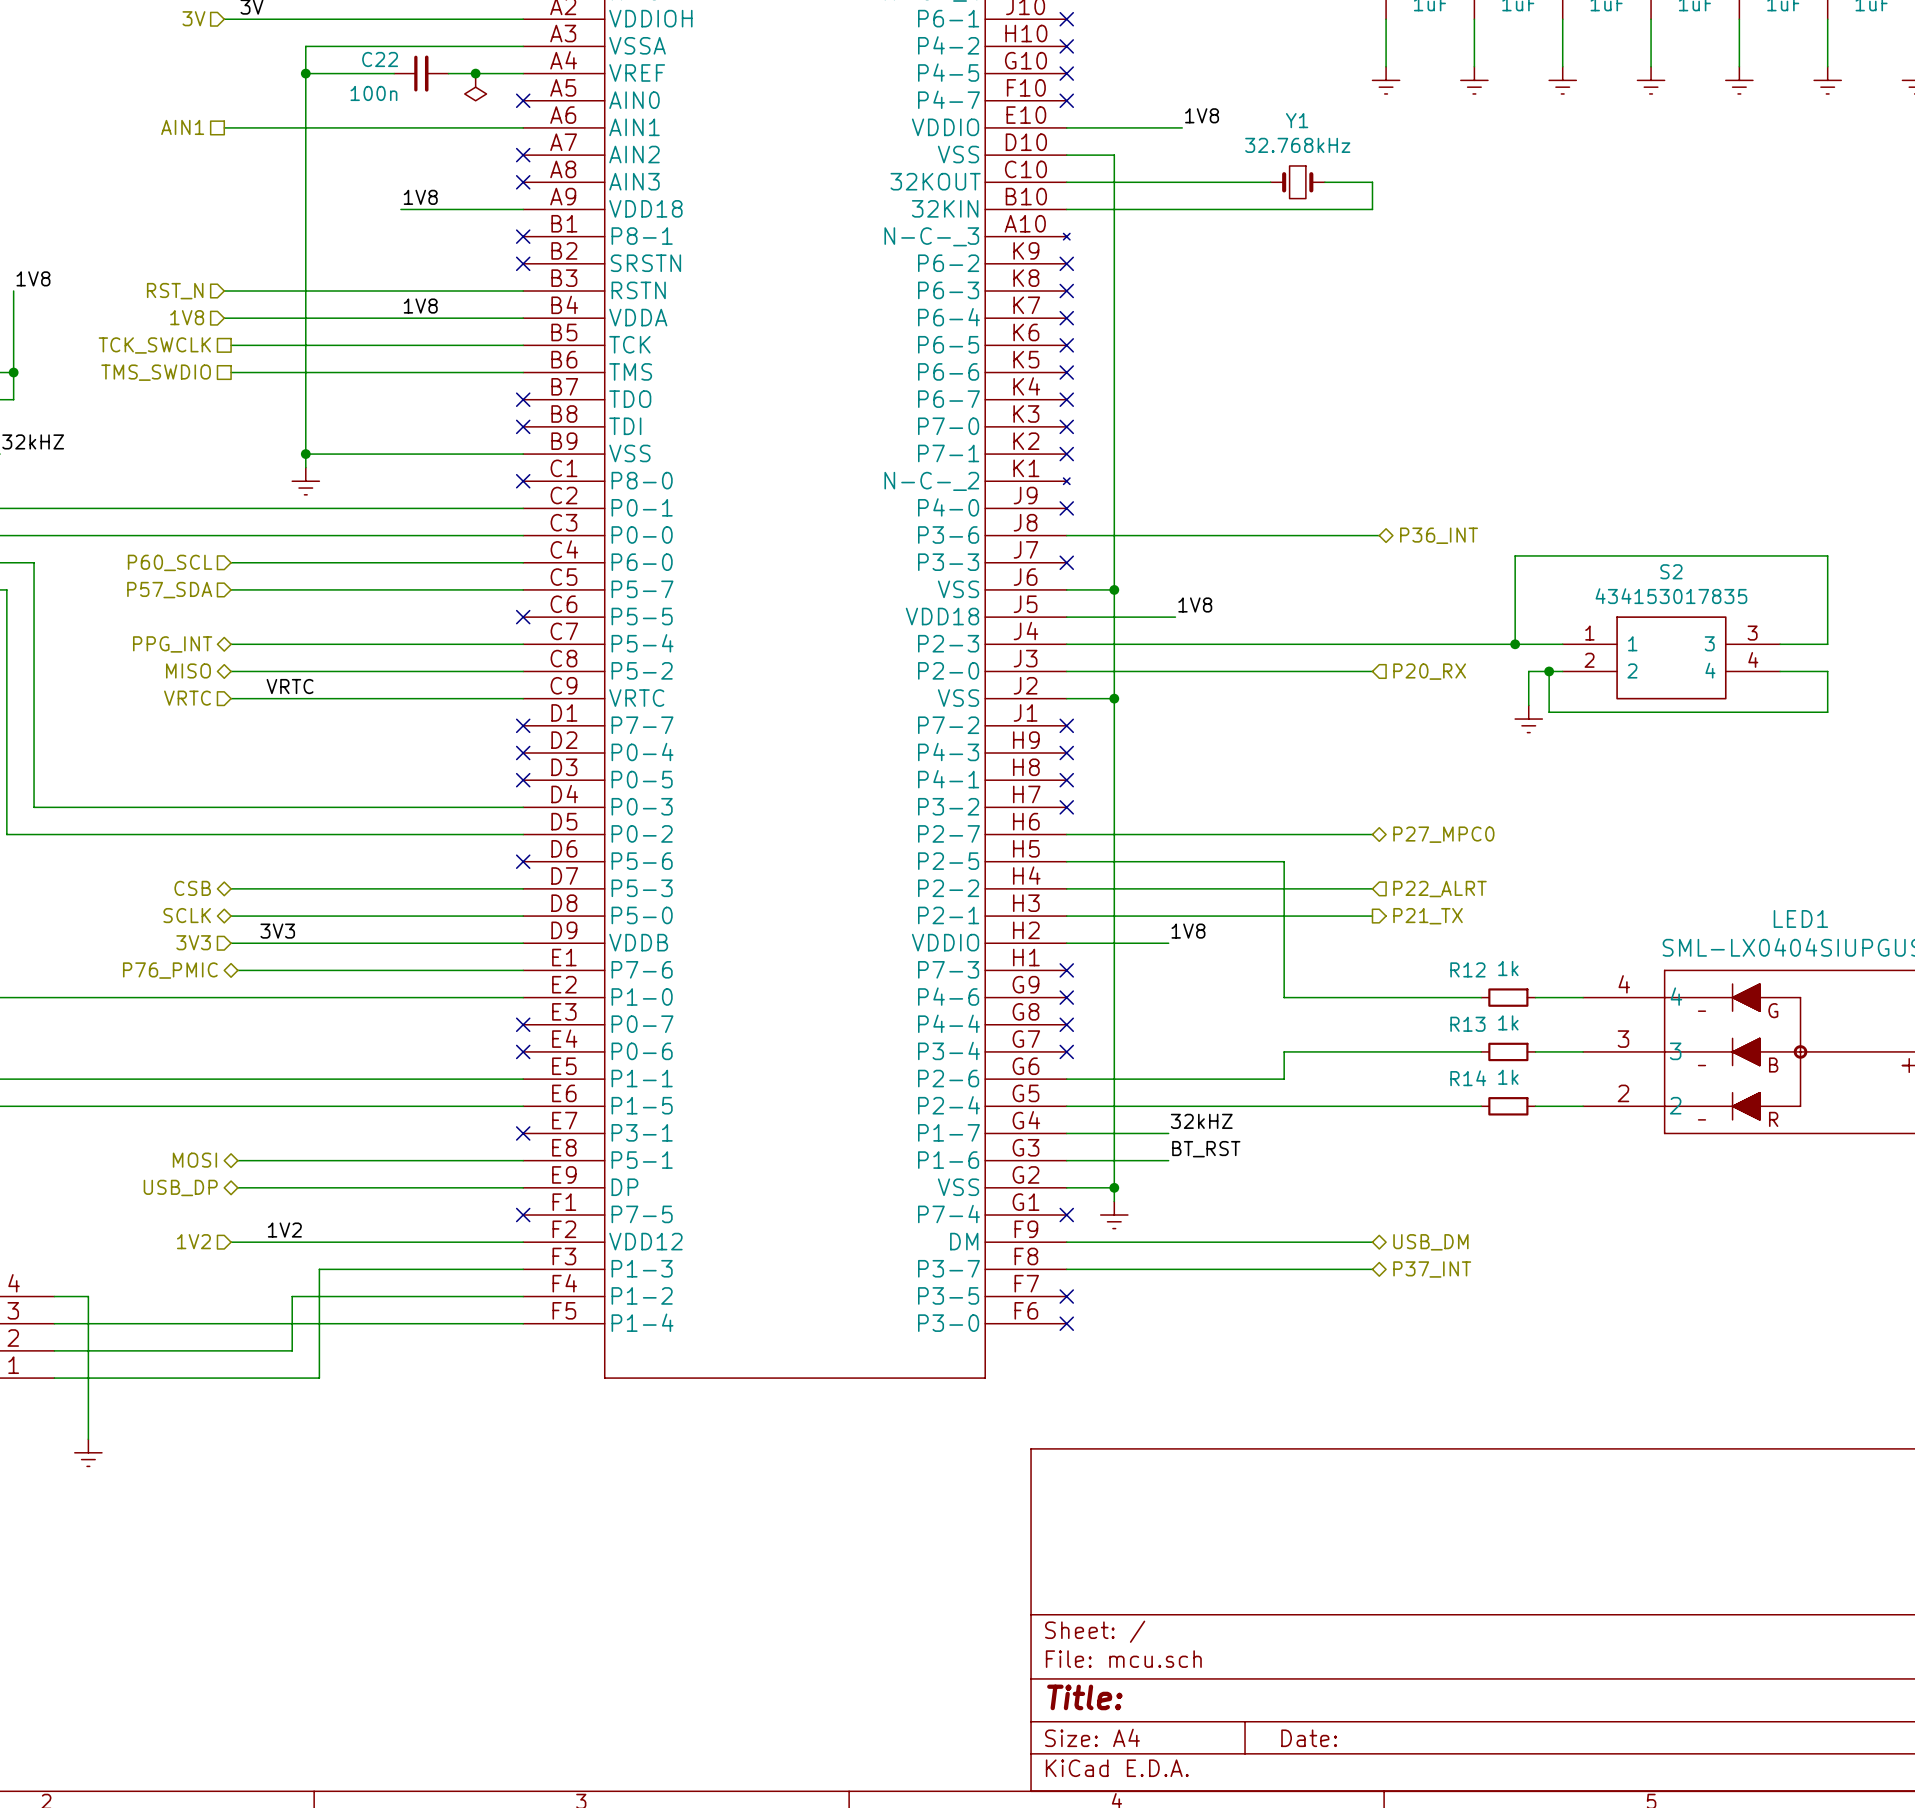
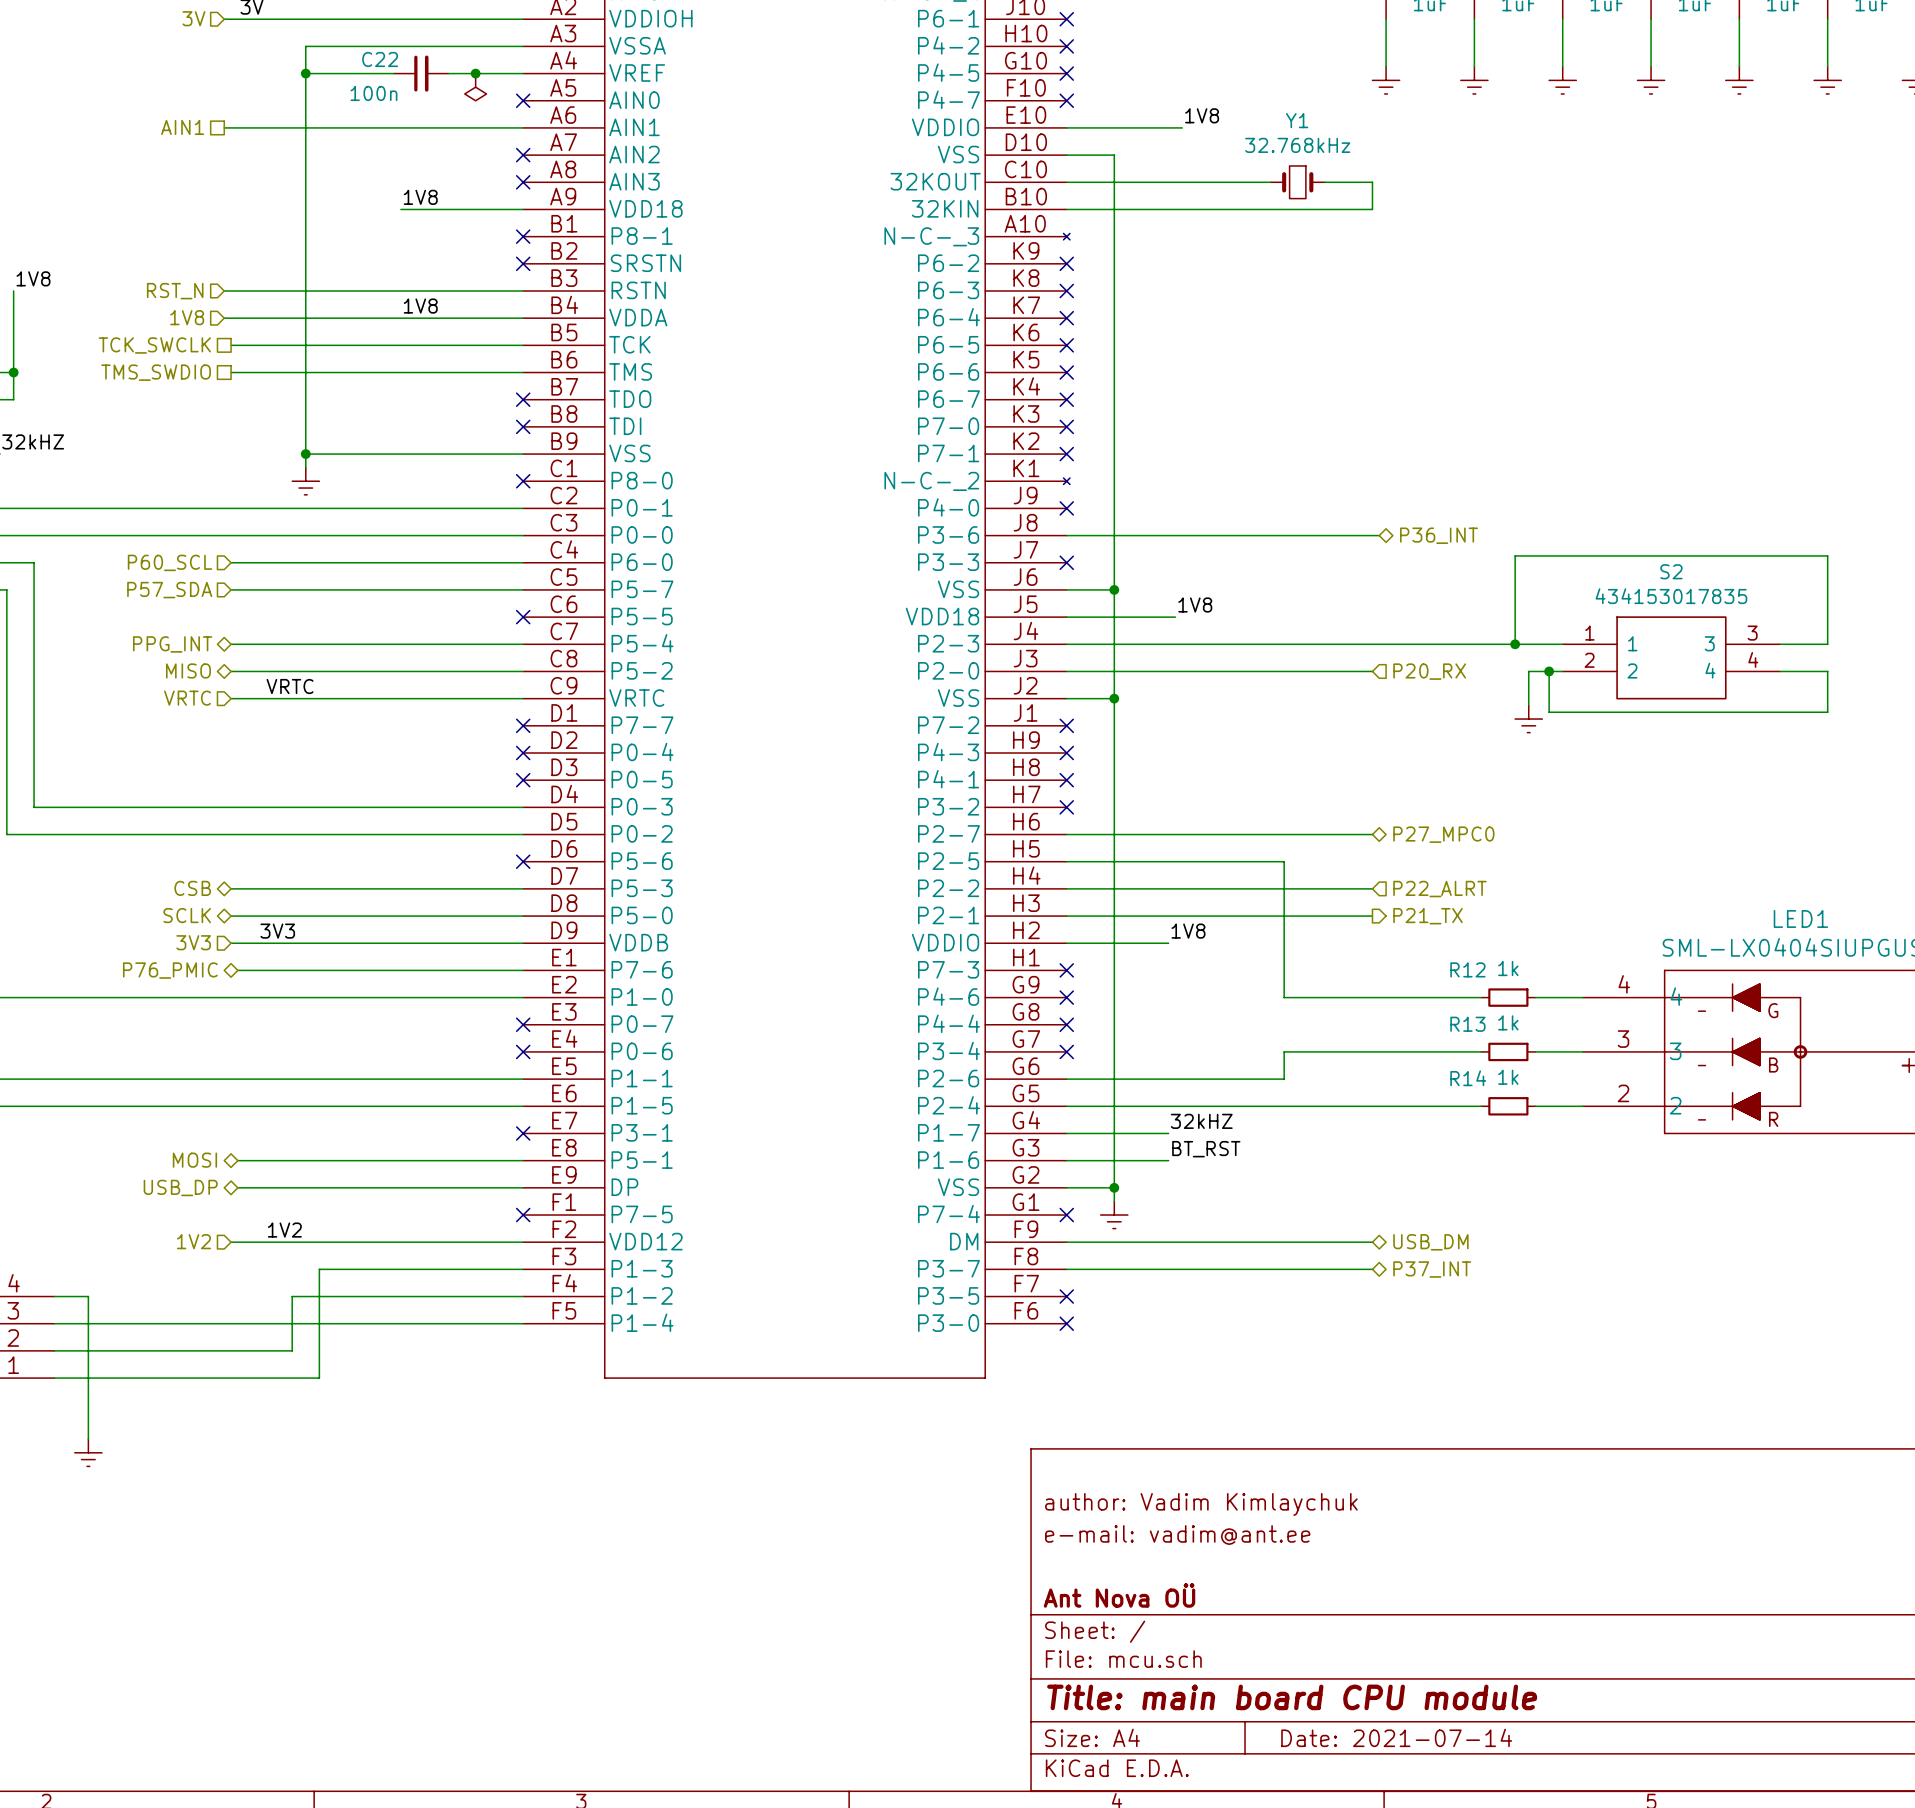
title block: none -> author: Vadim Kimlaychuk (1201, 1504)
title block: none -> e-mail: vadim@ant.ee (1177, 1535)
title block: none -> Ant Nova OÜ (1119, 1595)
title block: Title: (1084, 1697) -> Title: main board CPU module (1292, 1697)
title block: Date: (1309, 1738) -> Date: 2021-07-14 (1396, 1737)

